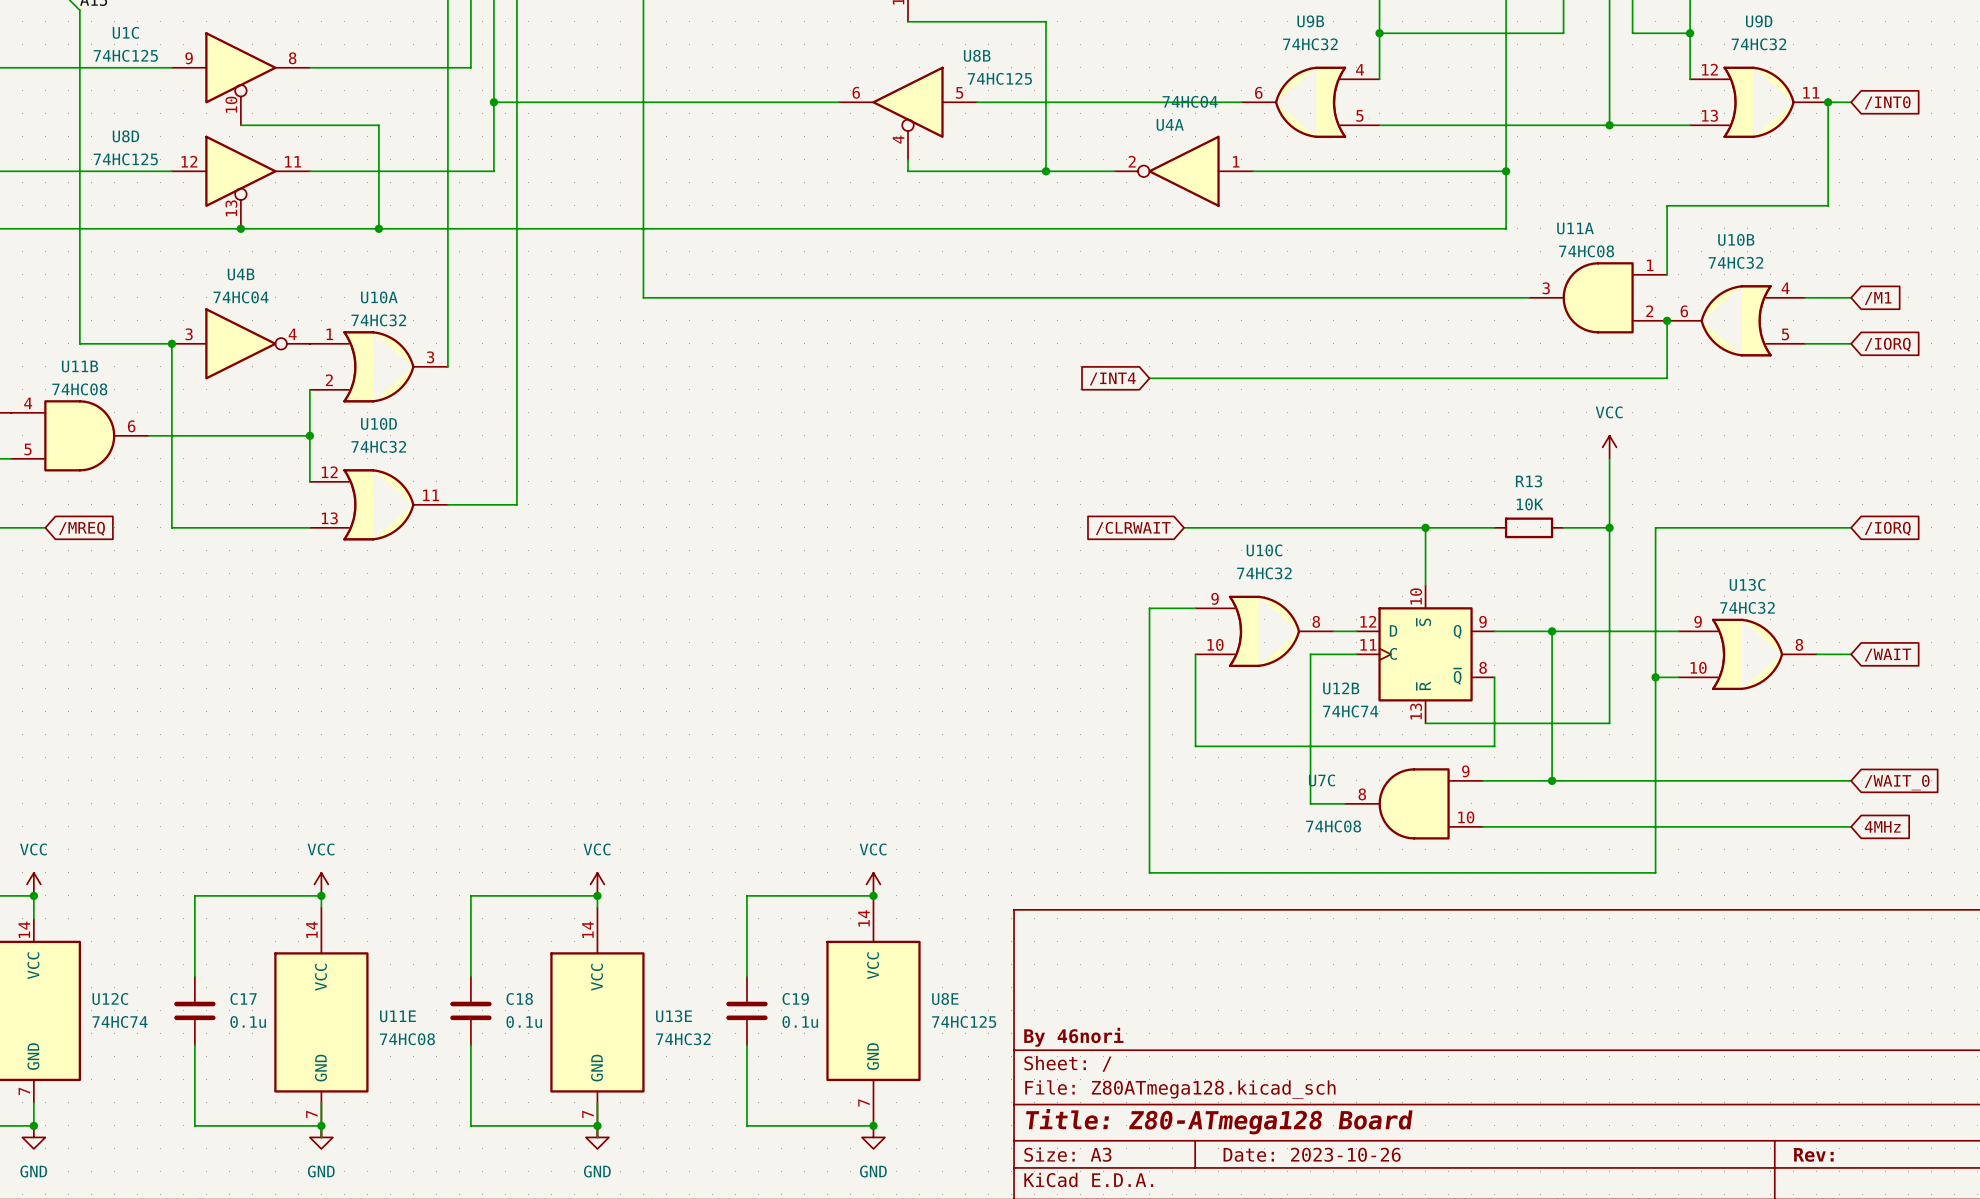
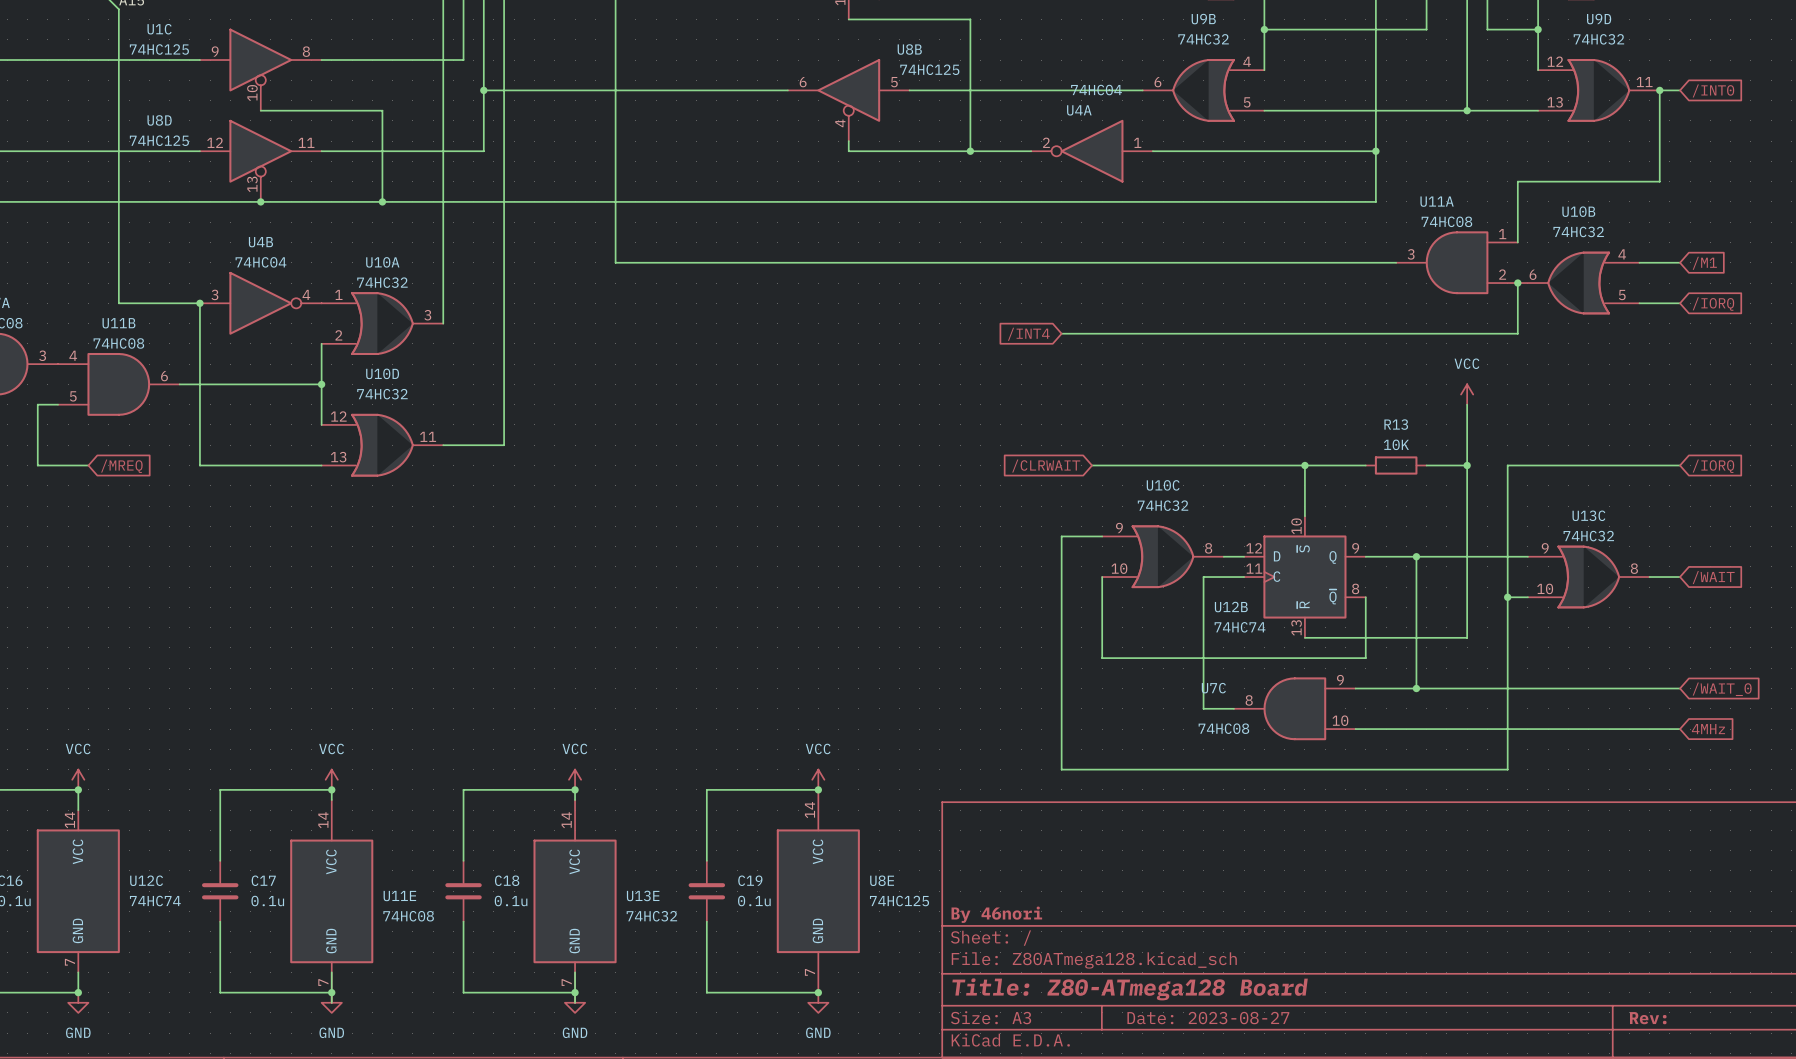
title block: Date: 2023-10-26 (1312, 1154) -> Date: 2023-08-27 (1208, 1018)

